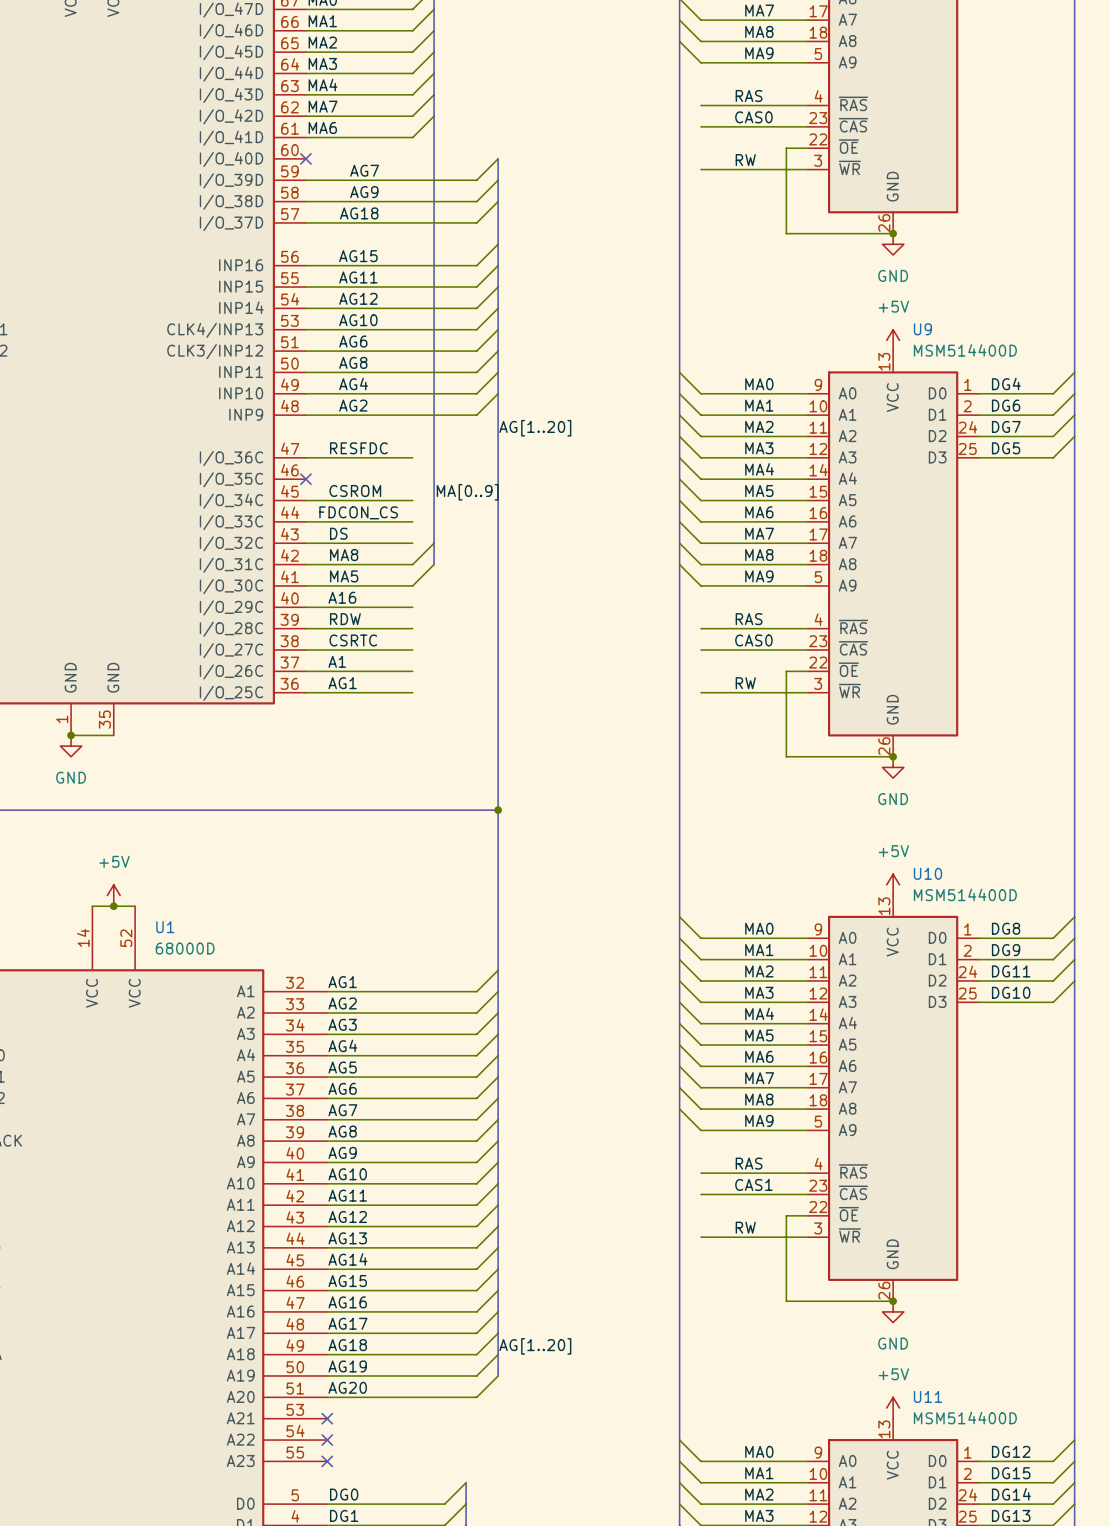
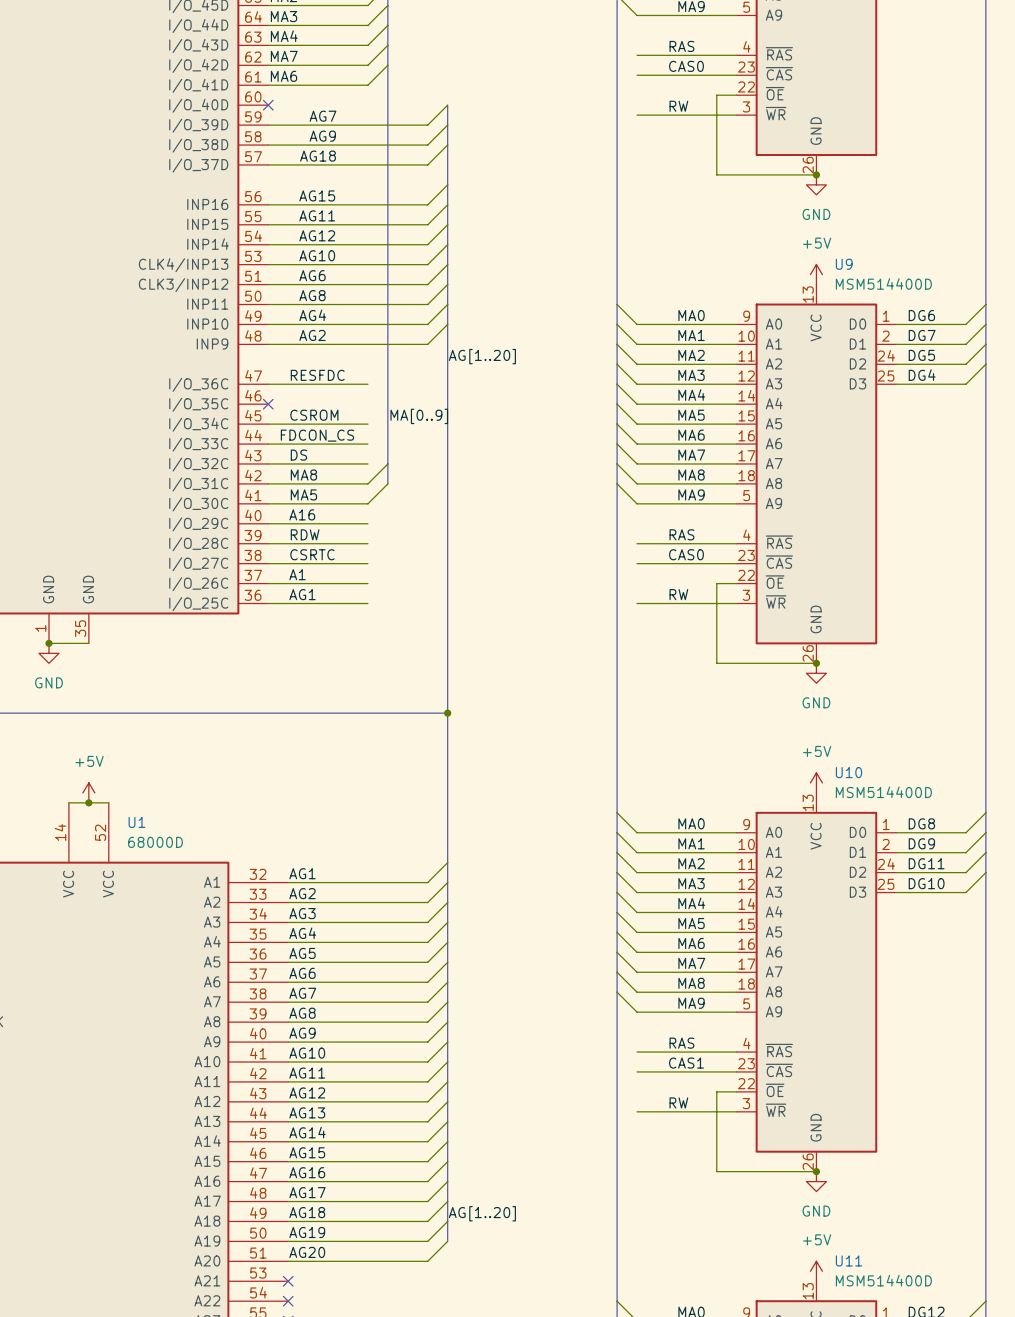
label: DG4 (1006, 383) -> DG6 (921, 315)
label: DG6 (1006, 405) -> DG7 (922, 335)
label: DG7 (1006, 426) -> DG5 (921, 355)
label: DG5 (1006, 448) -> DG4 (922, 375)

